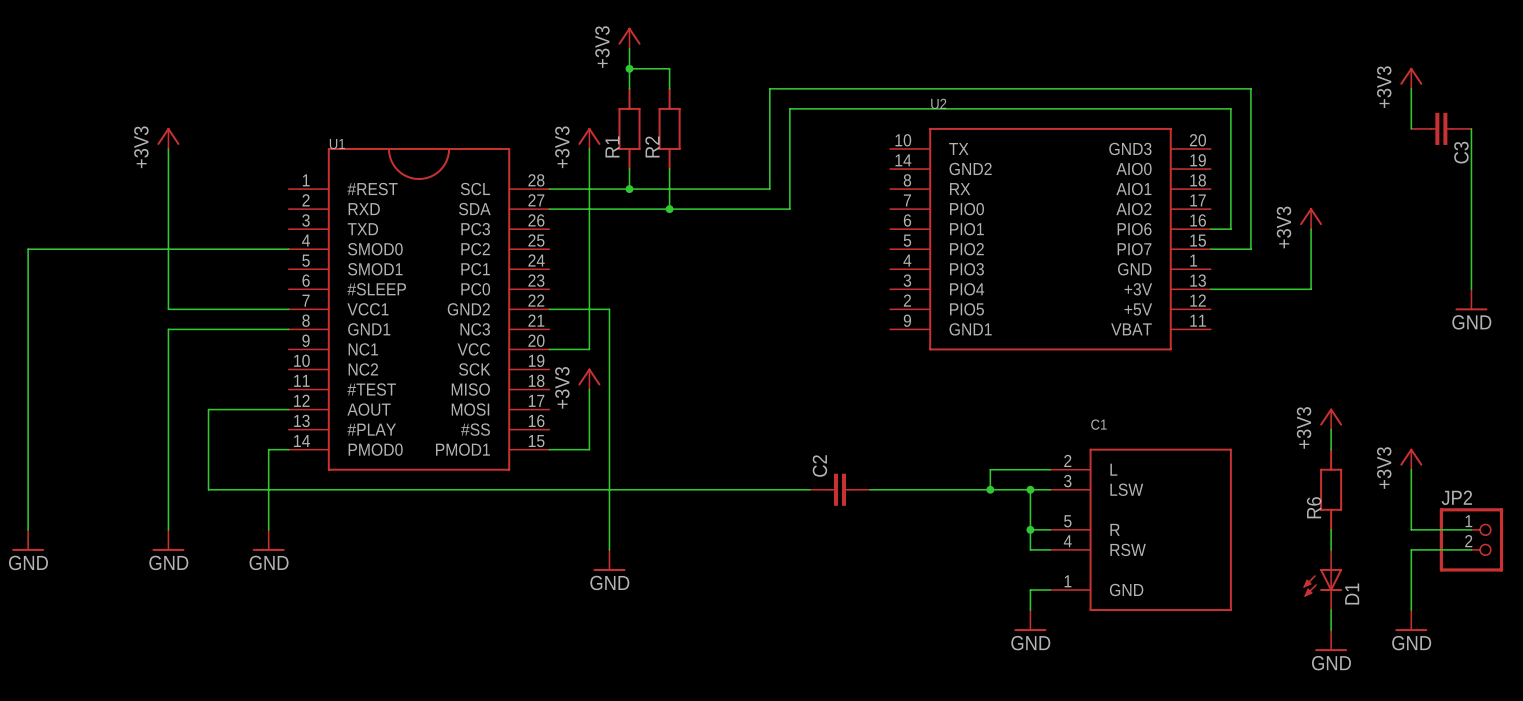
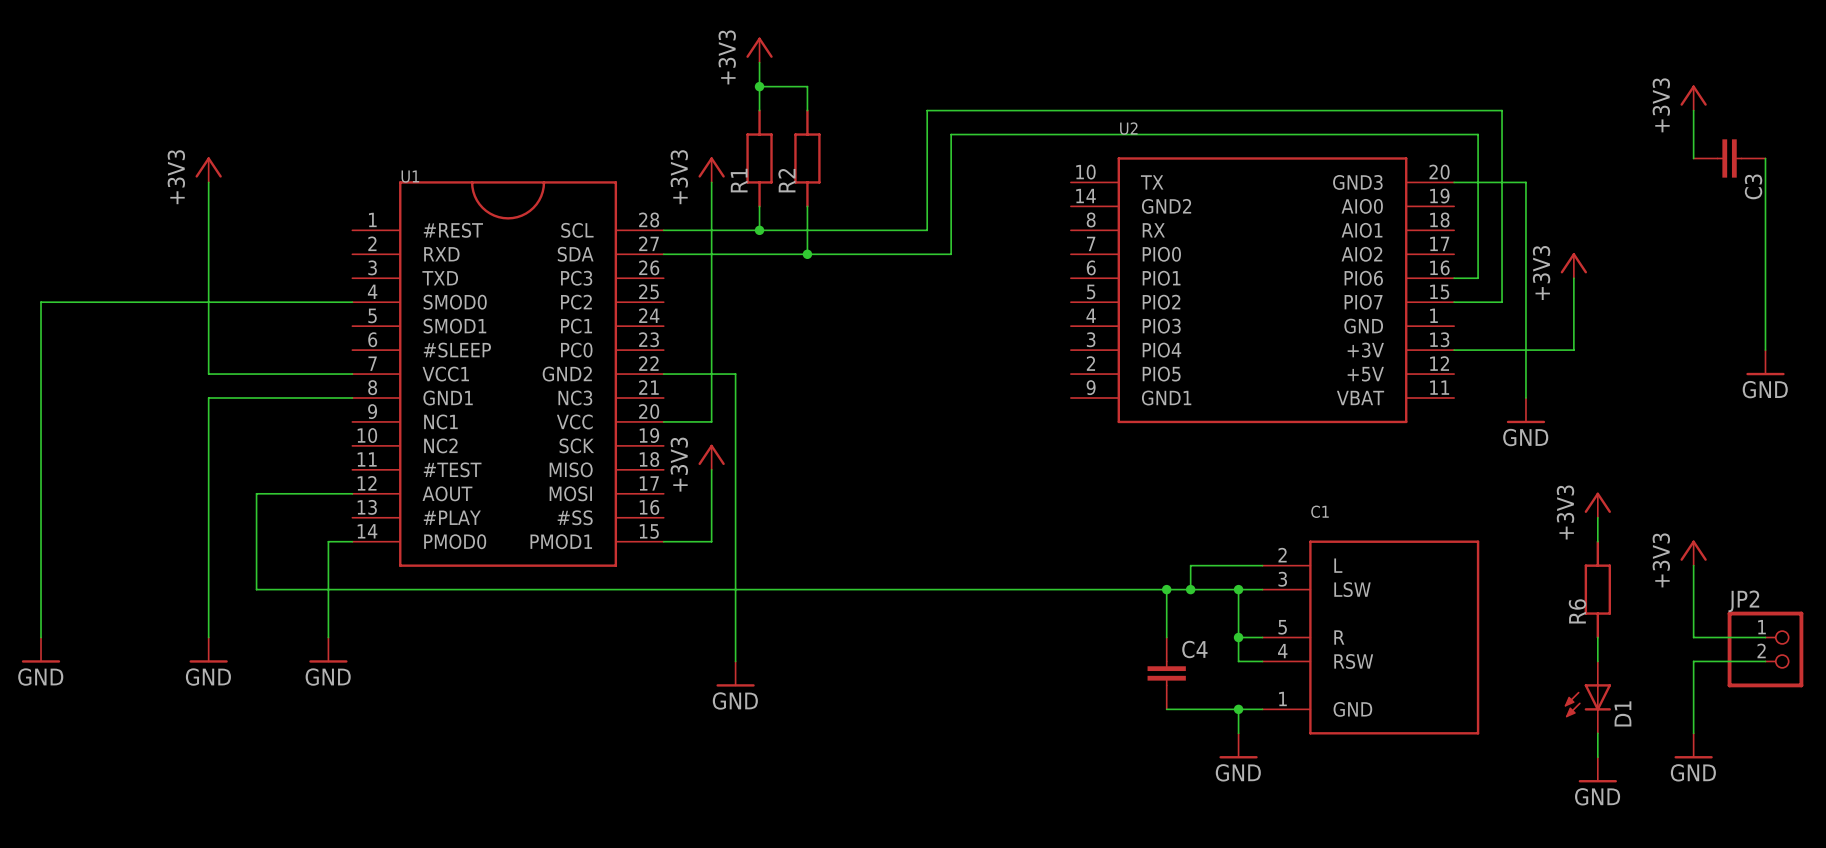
wire: none -> (1454, 182) (1525, 182) (1525, 398)
power symbol: none -> GND (1525, 410)
C2: (839, 489) -> none
wire: none -> (1166, 589) (1166, 637)
junction: none -> (1166, 589)
C4: none -> (1166, 673)
wire: none -> (1166, 709) (1238, 709)
junction: none -> (1238, 709)

